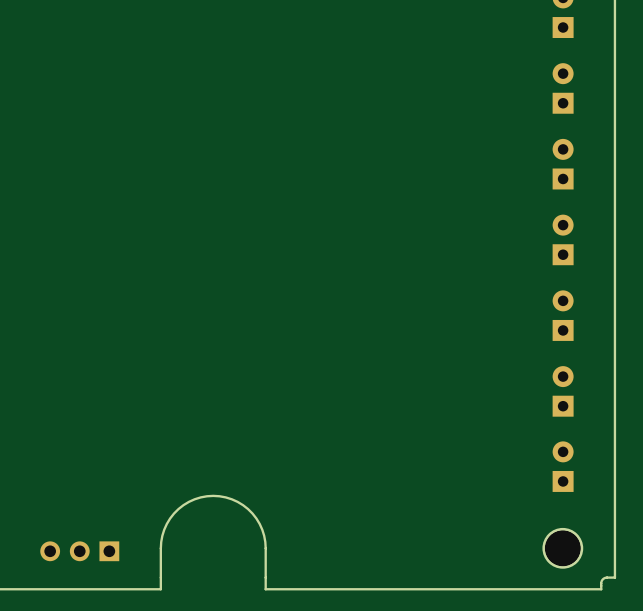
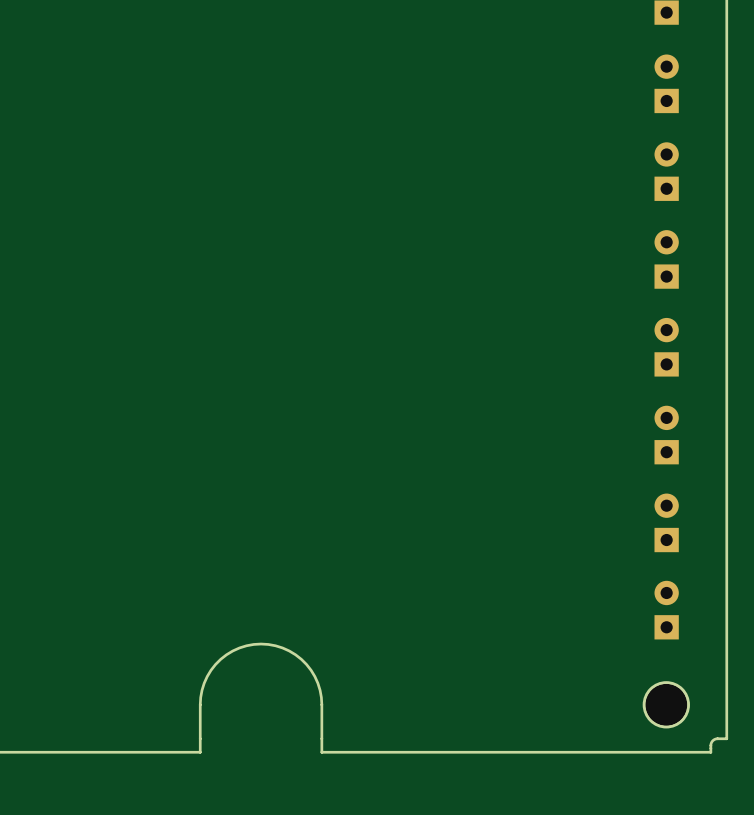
part: (79, 551) -> none

